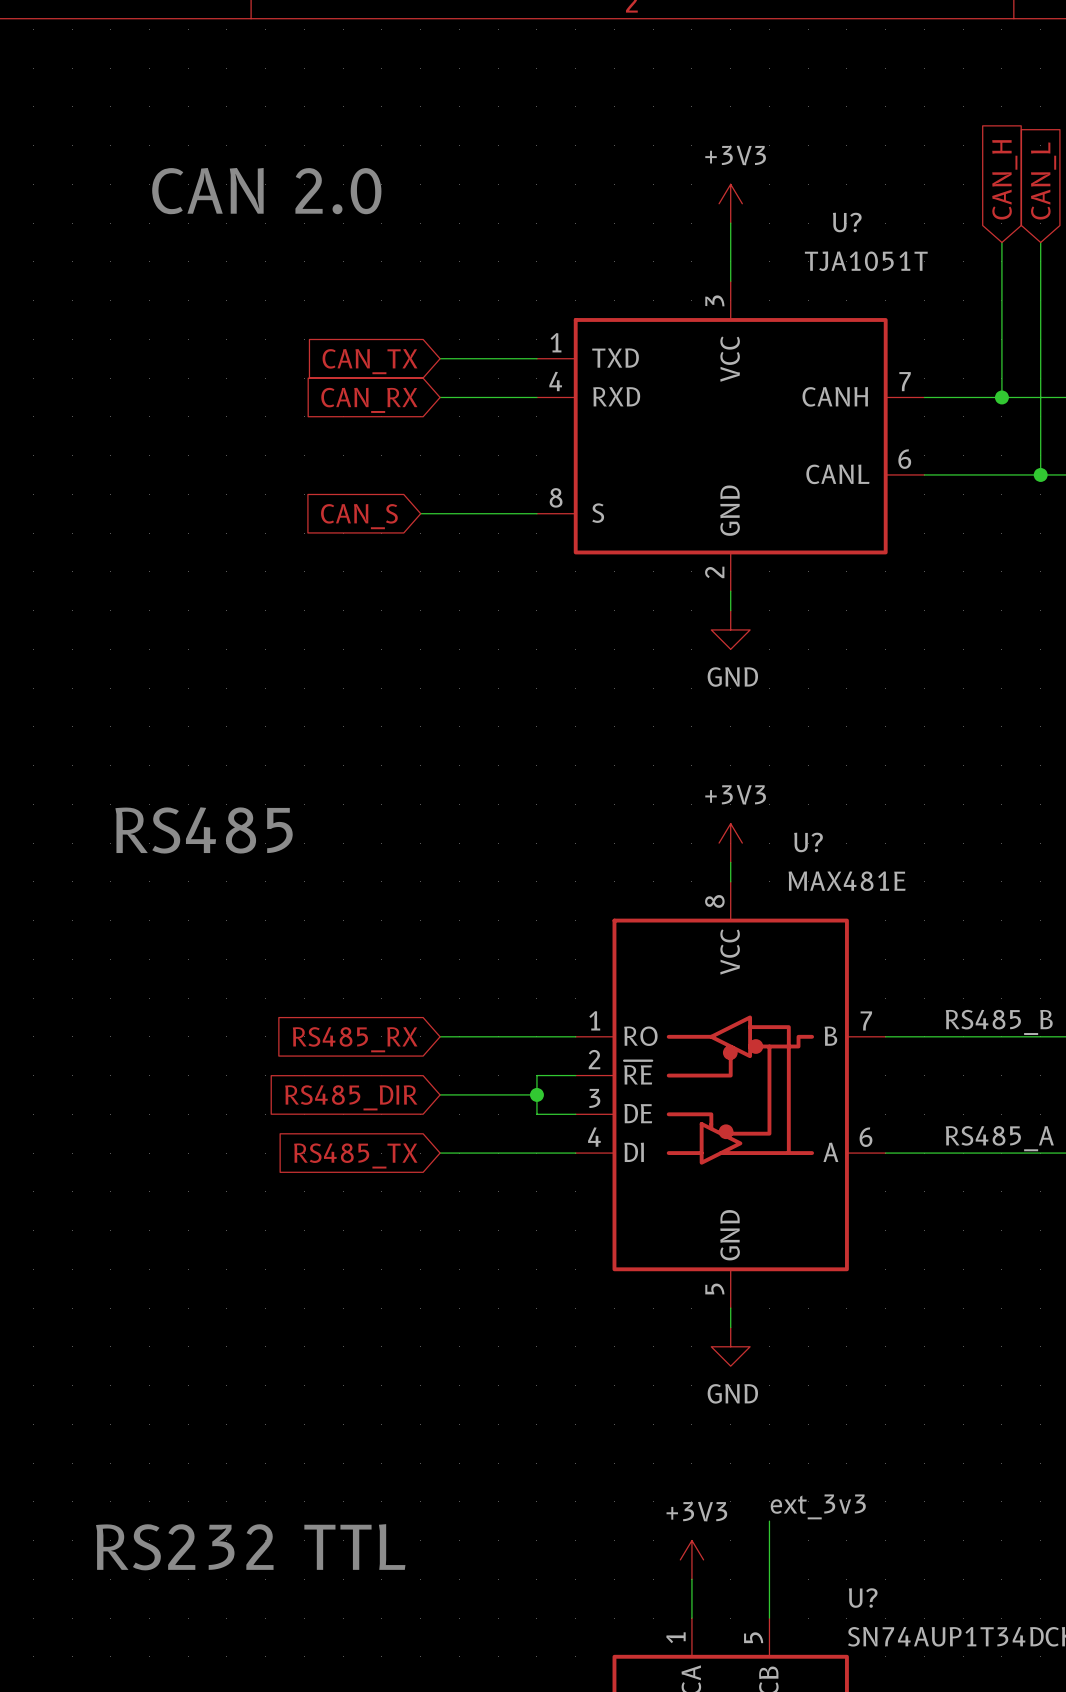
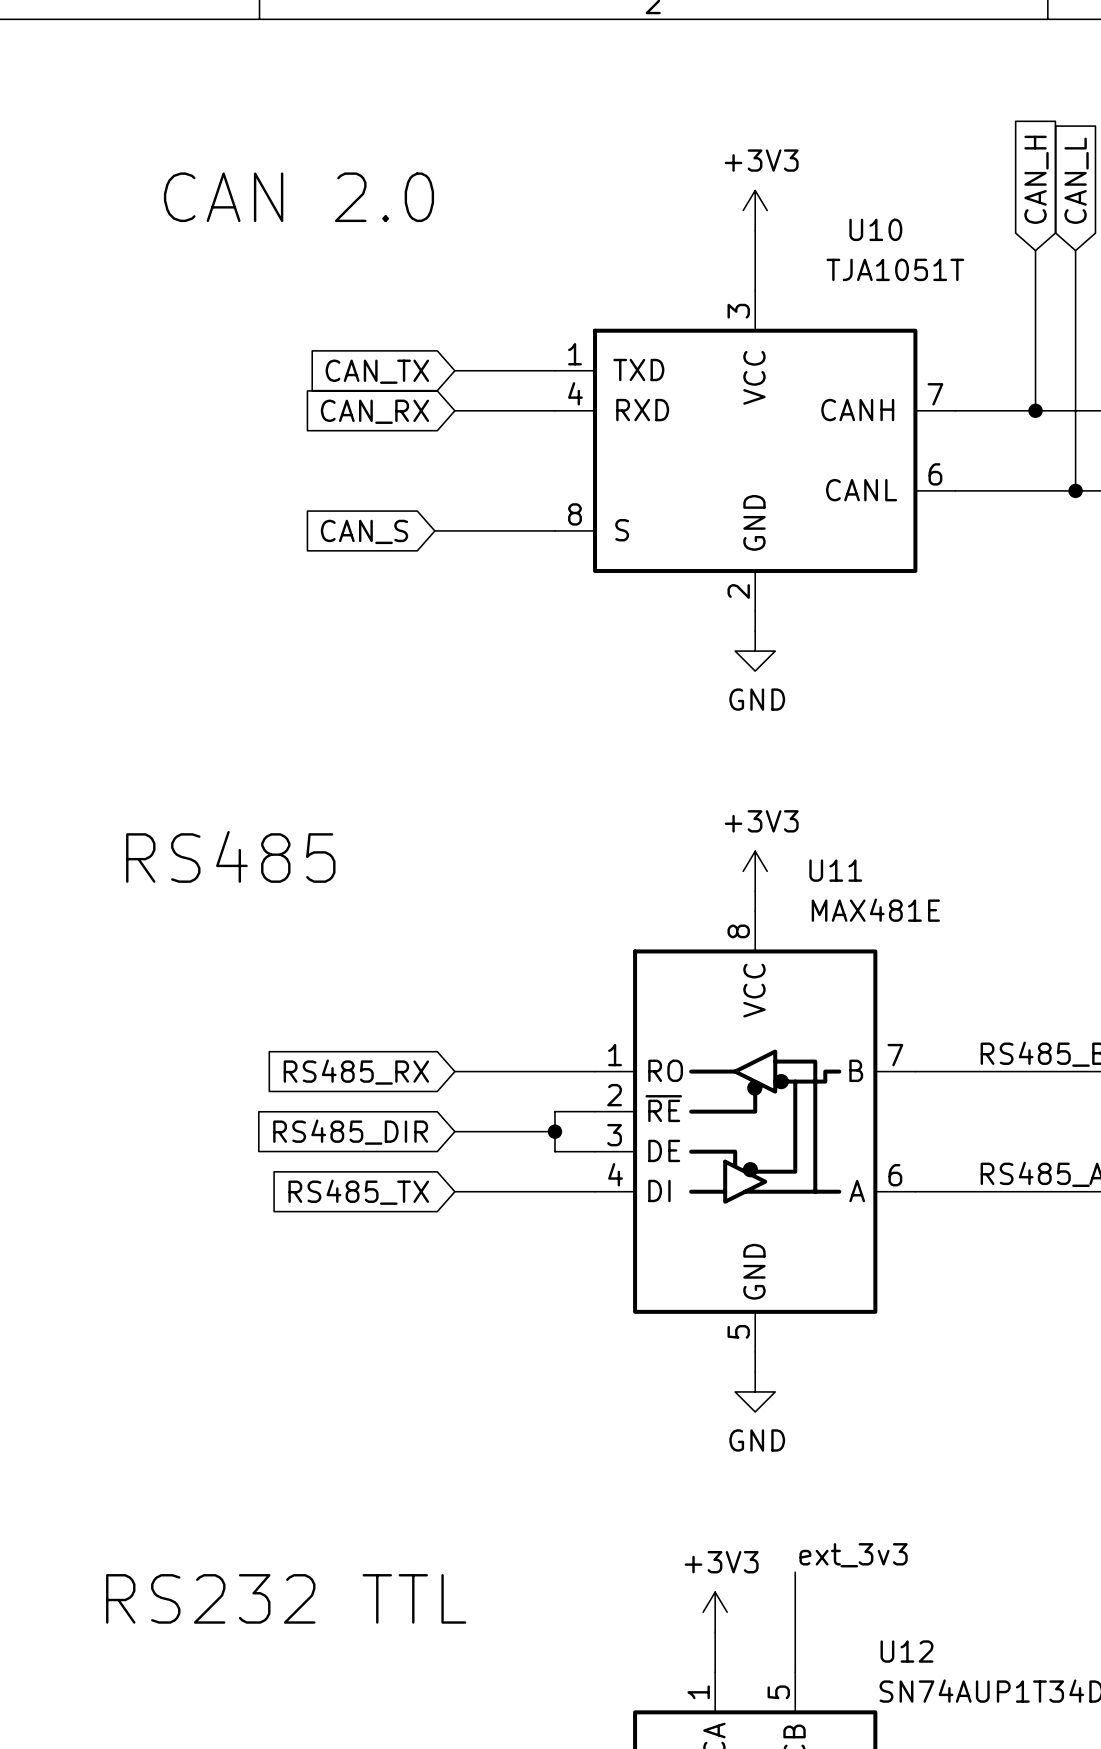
U? name: U? (847, 222) -> U10 (875, 229)
U? name: U? (808, 842) -> U11 (835, 870)
U? name: U? (863, 1598) -> U12 (906, 1651)

